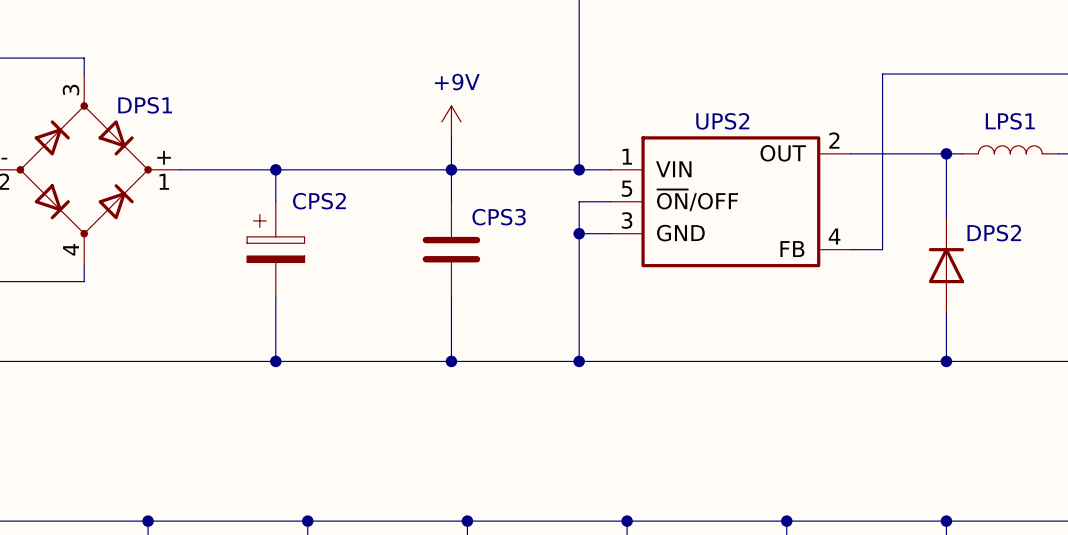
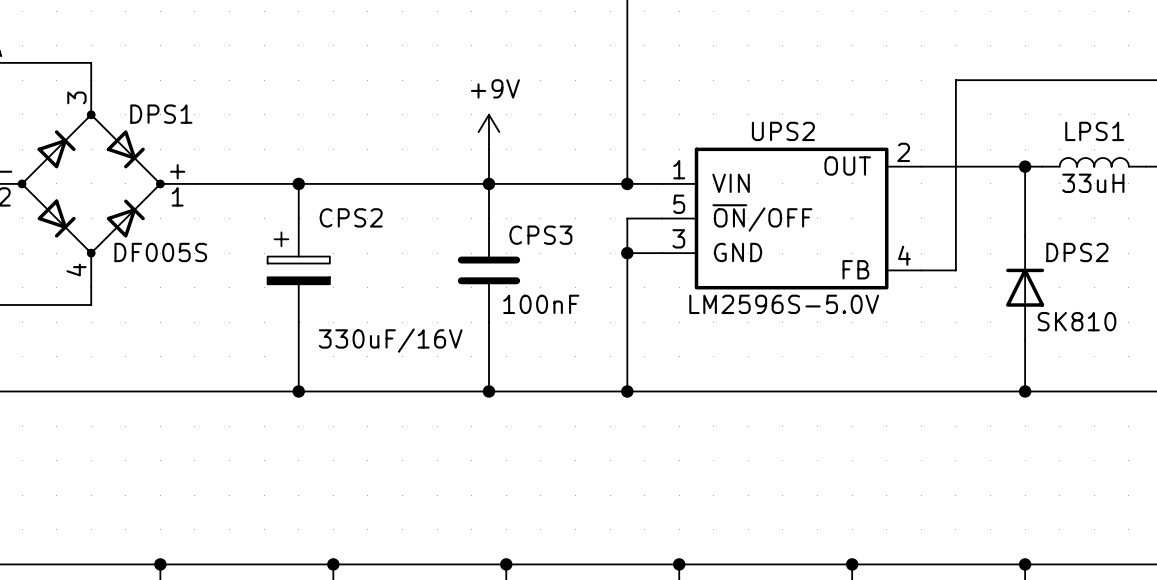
LPS1 value: none -> 33uH (1093, 183)
DPS1 value: none -> DF005S (160, 252)
CPS3 value: none -> 100nF (541, 304)
UPS2 value: none -> LM2596S-5.0V (784, 304)
DPS2 value: none -> SK810 (1076, 321)
CPS2 value: none -> 330uF/16V (390, 340)

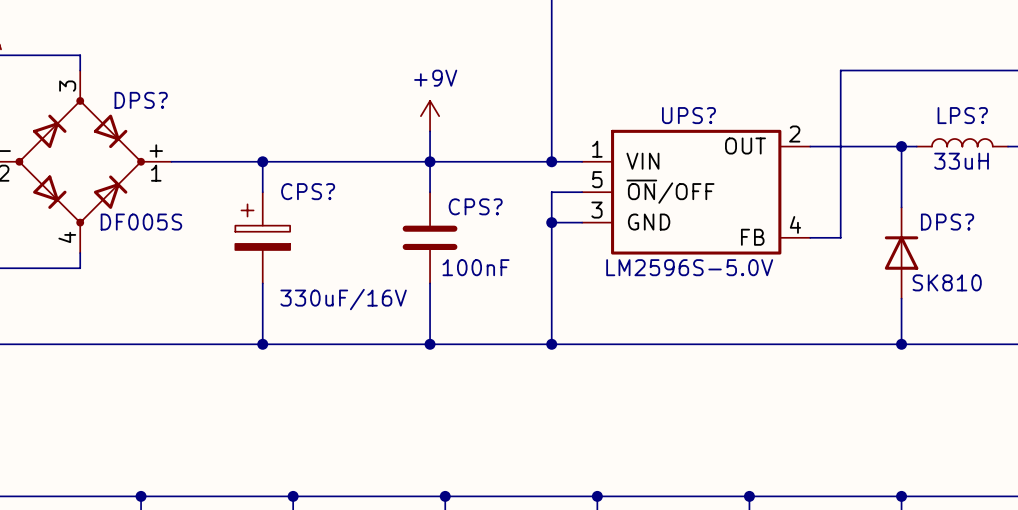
DPS1 name: DPS1 (161, 114) -> DPS? (141, 100)
UPS2 name: UPS2 (783, 131) -> UPS? (688, 115)
LPS1 name: LPS1 (1094, 131) -> LPS? (962, 115)
CPS2 name: CPS2 (351, 217) -> CPS? (308, 191)
CPS3 name: CPS3 (540, 235) -> CPS? (475, 206)
DPS2 name: DPS2 (1077, 252) -> DPS? (947, 222)

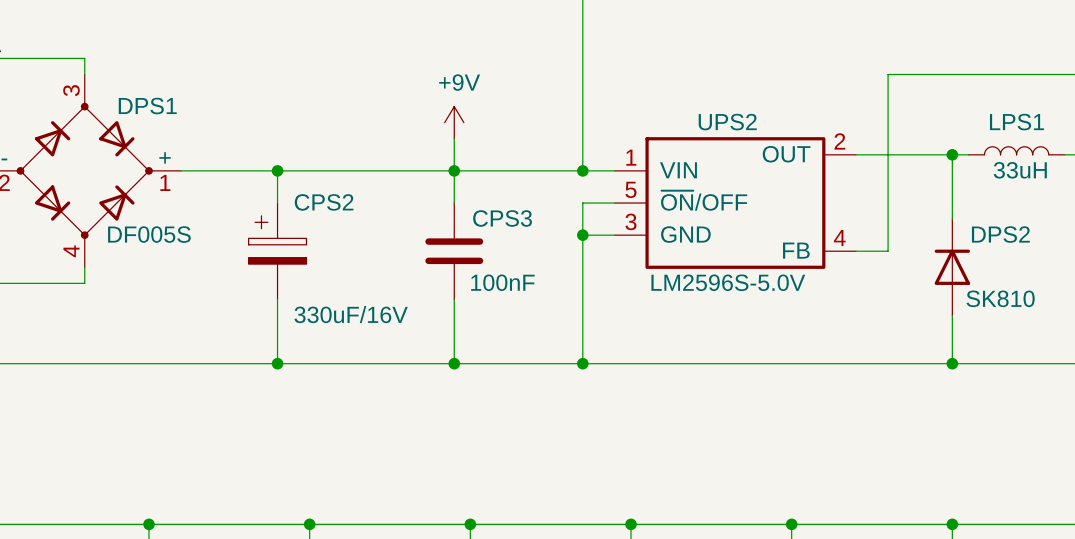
DPS? name: DPS? (141, 100) -> DPS1 (147, 106)
UPS? name: UPS? (688, 115) -> UPS2 (727, 122)
LPS? name: LPS? (962, 115) -> LPS1 (1016, 122)
CPS? name: CPS? (308, 191) -> CPS2 (324, 202)
CPS? name: CPS? (475, 206) -> CPS3 (502, 218)
DPS? name: DPS? (947, 222) -> DPS2 (1000, 234)

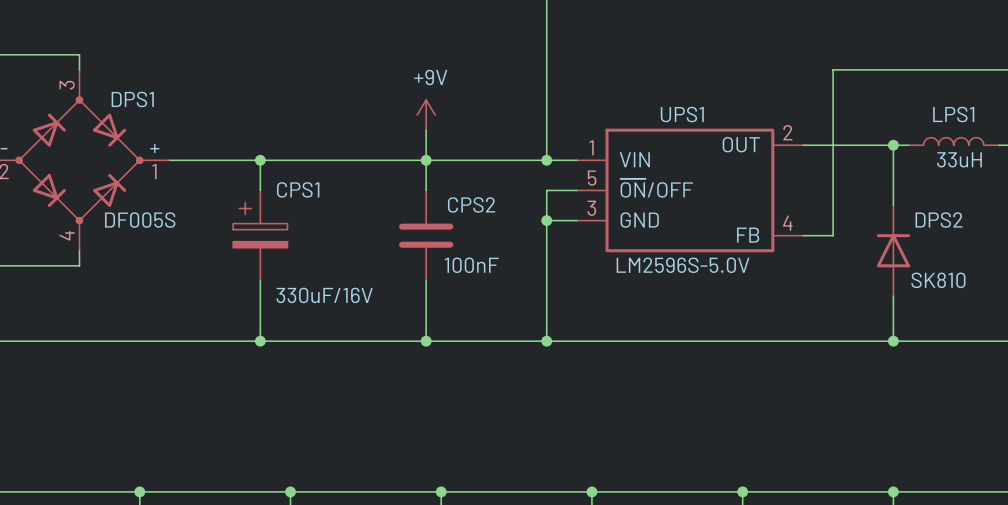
UPS2 name: UPS2 (727, 122) -> UPS1 (682, 114)
CPS2 name: CPS2 (324, 202) -> CPS1 (298, 189)
CPS3 name: CPS3 (502, 218) -> CPS2 (471, 204)

